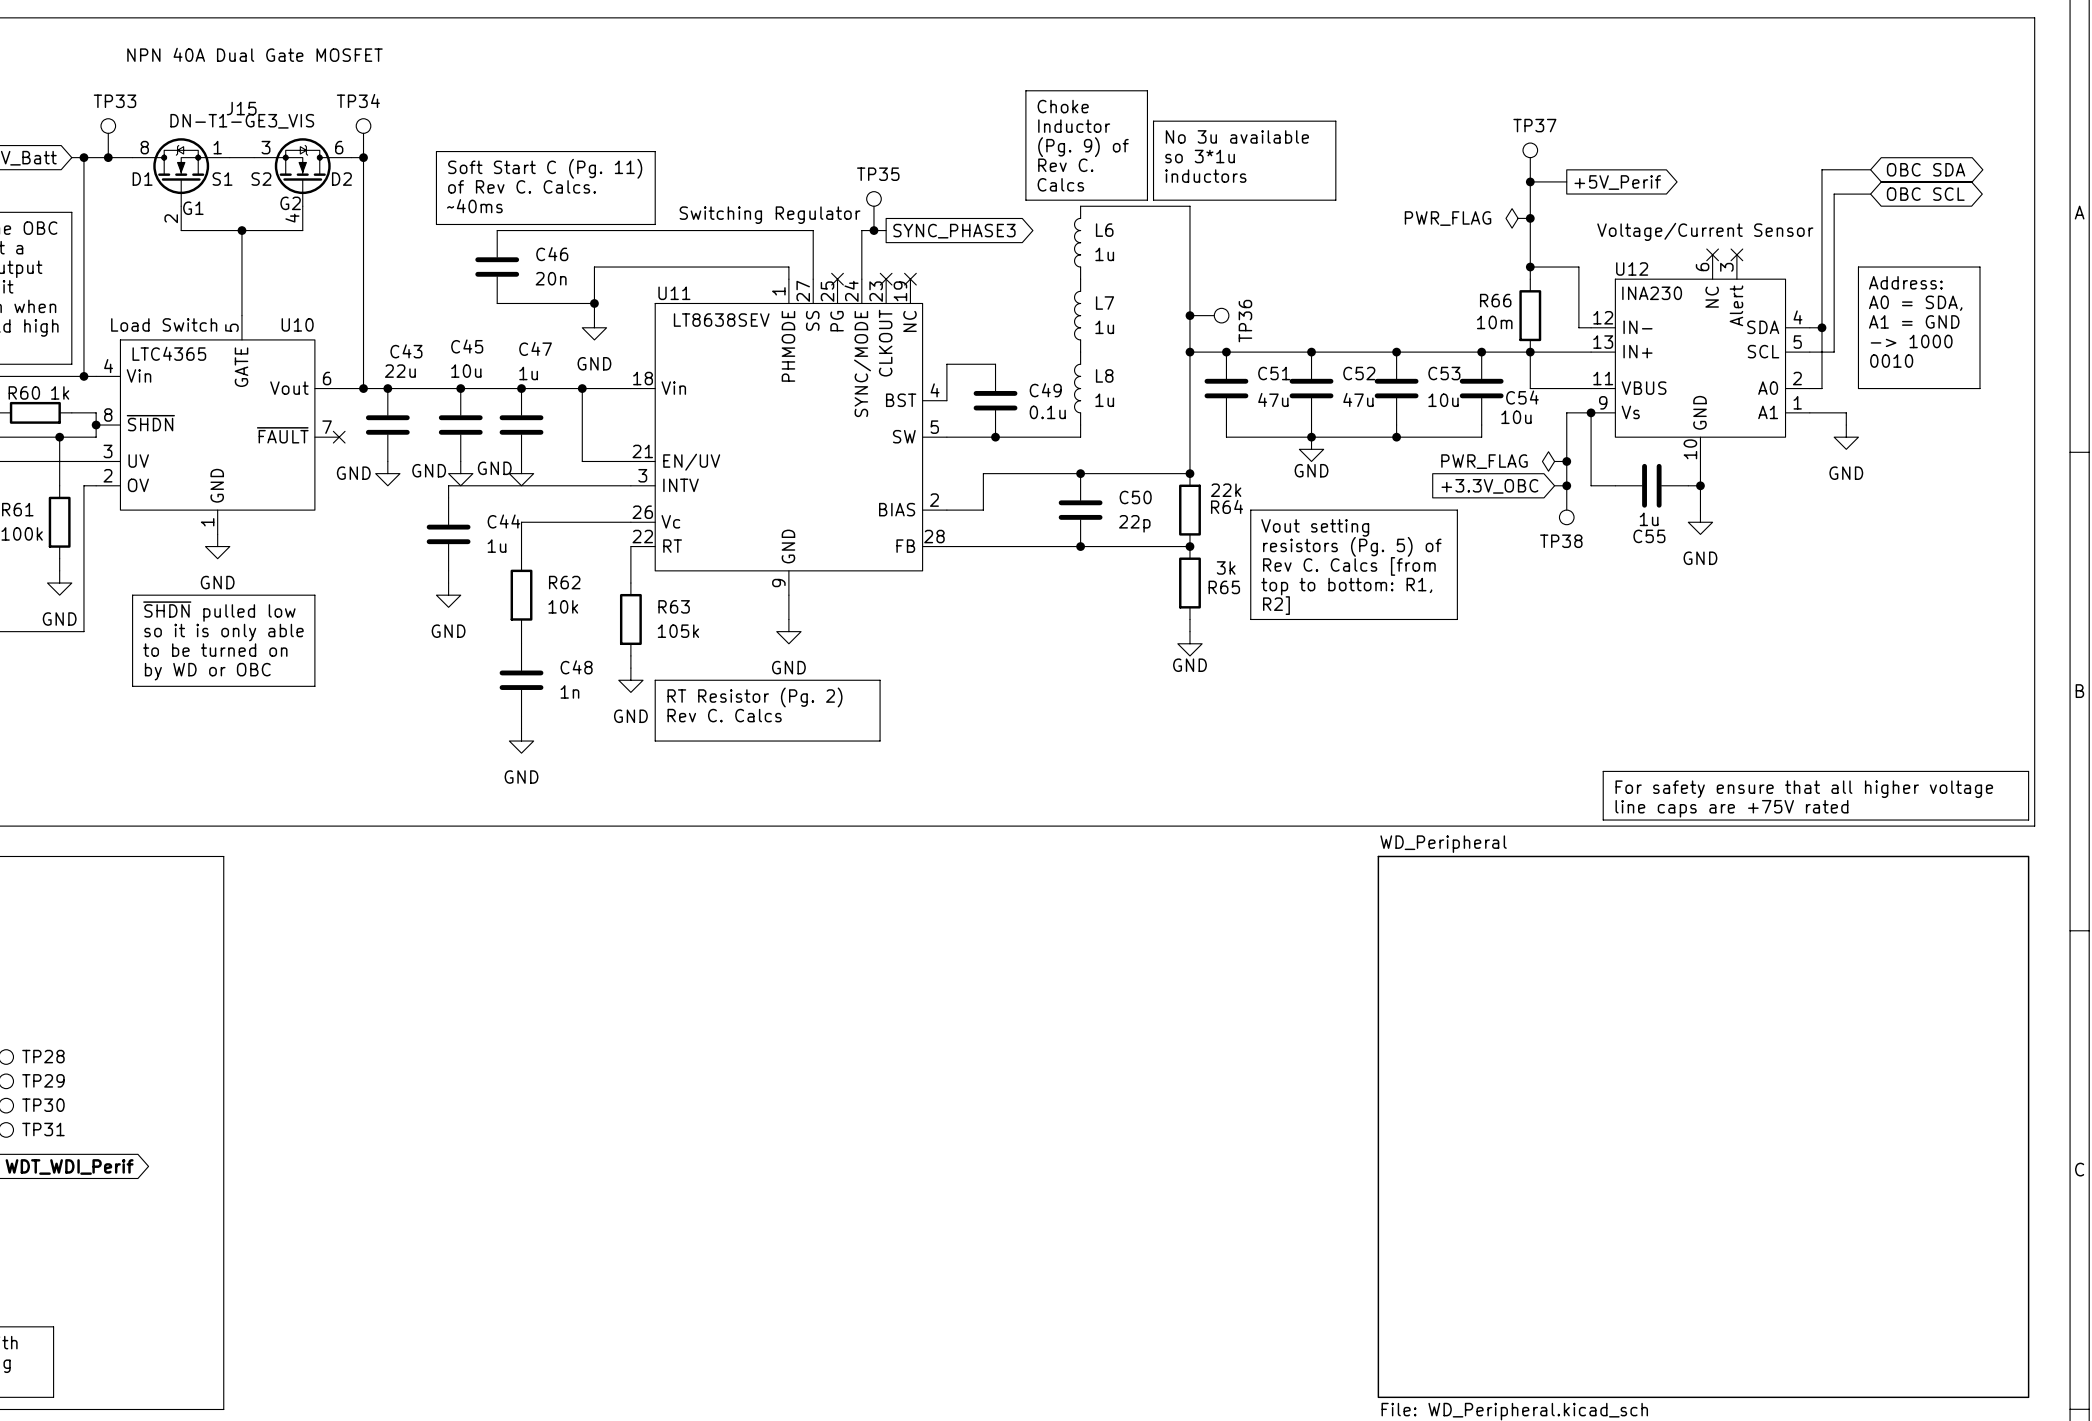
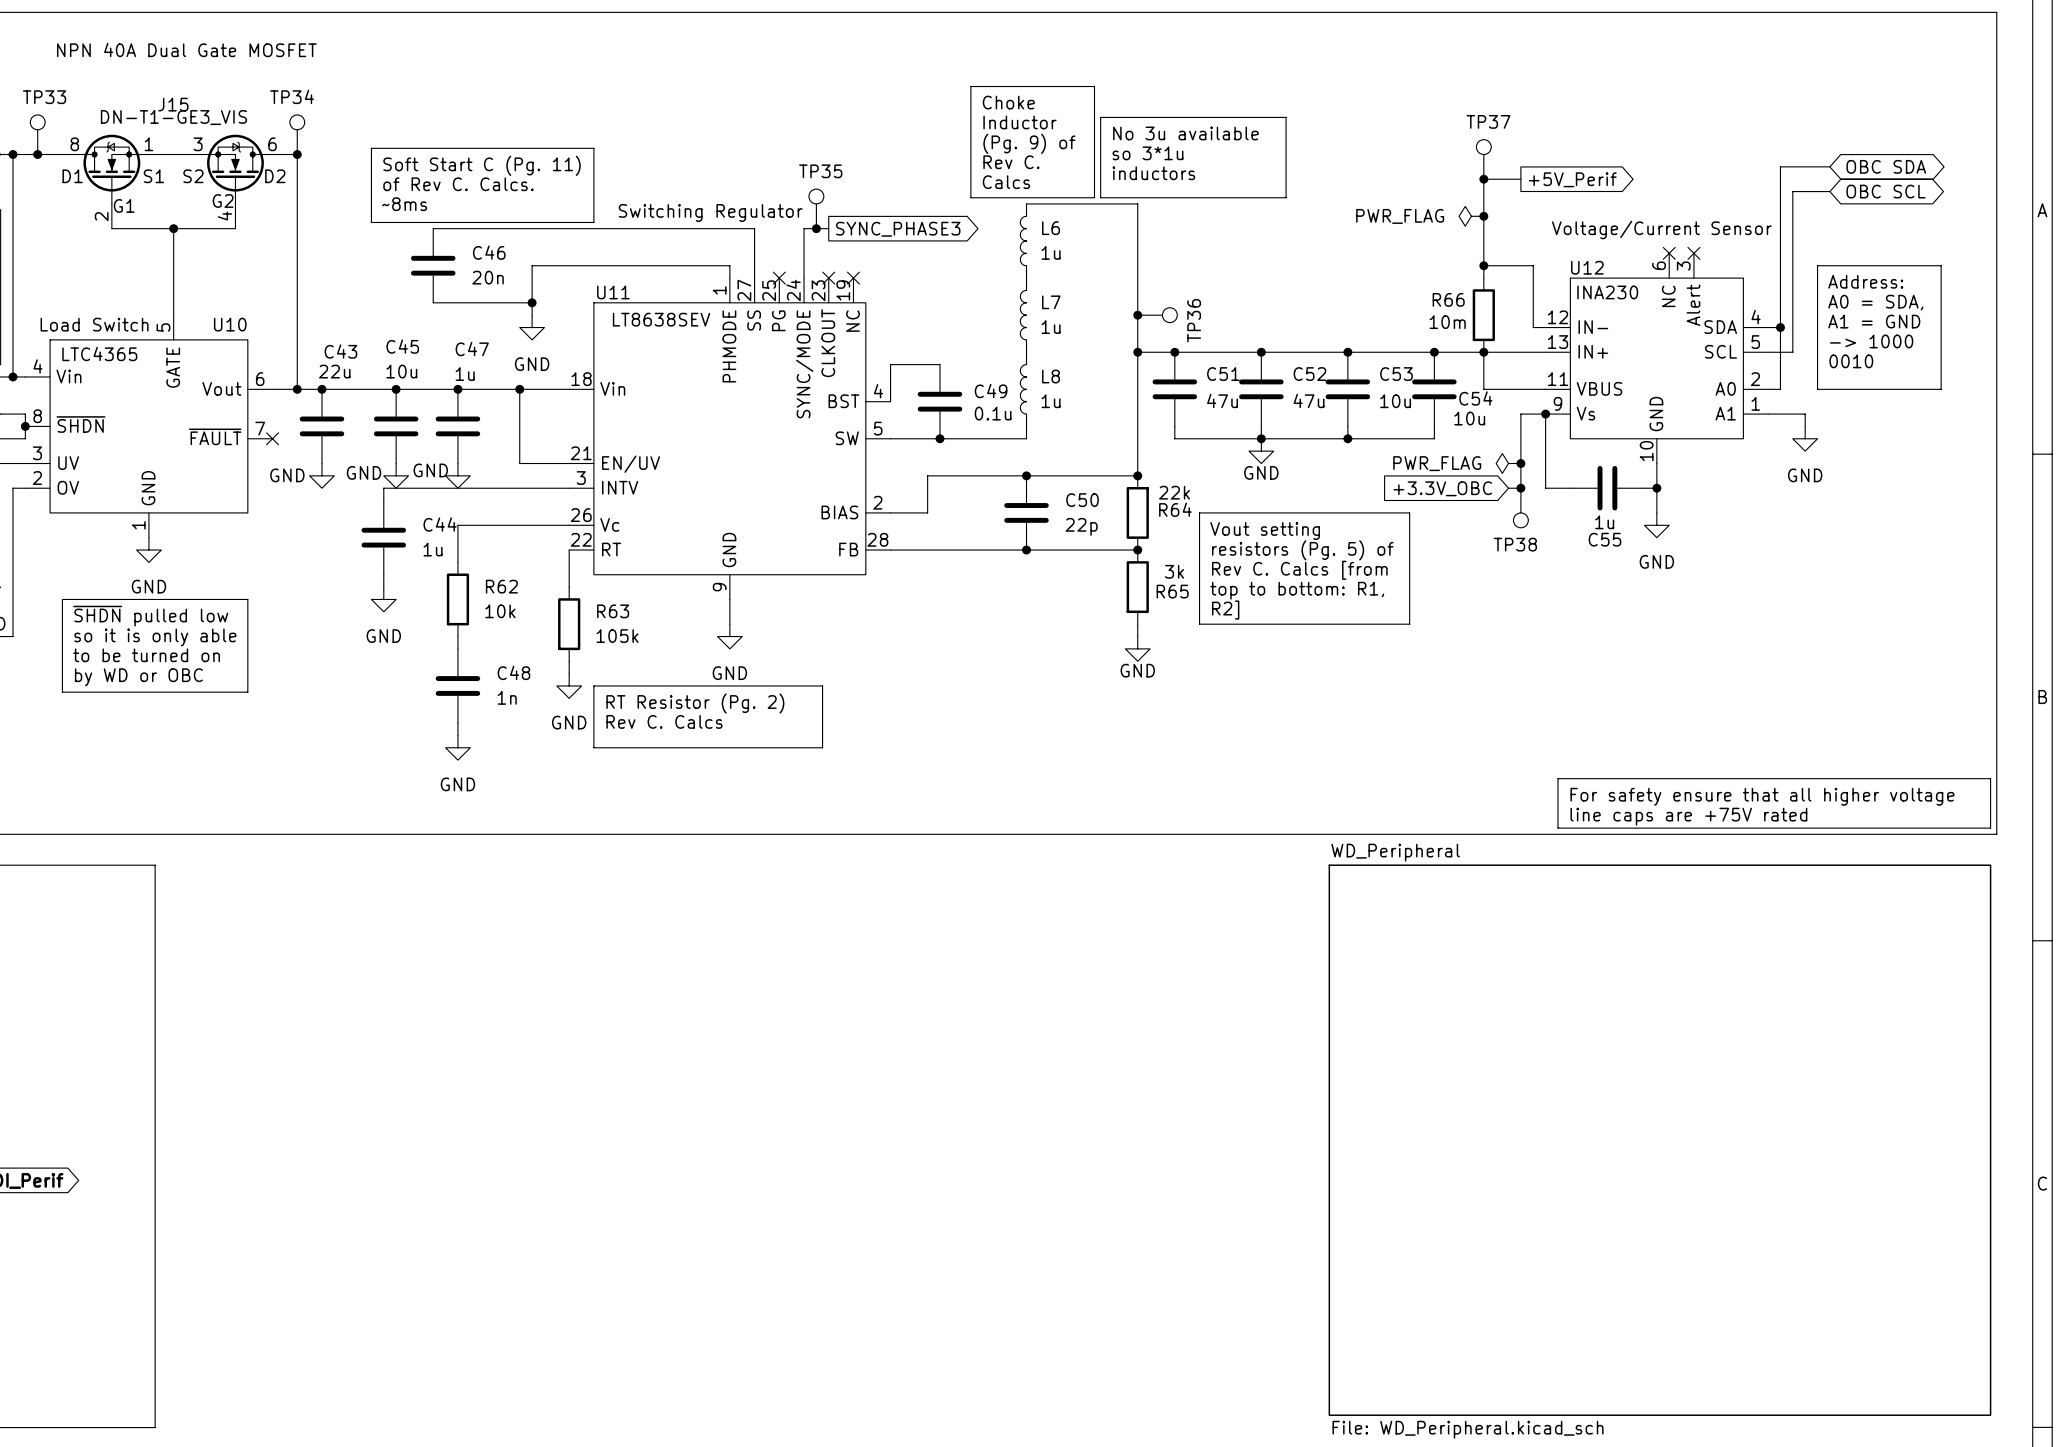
text: ~40ms (474, 206) -> ~8ms (404, 204)

